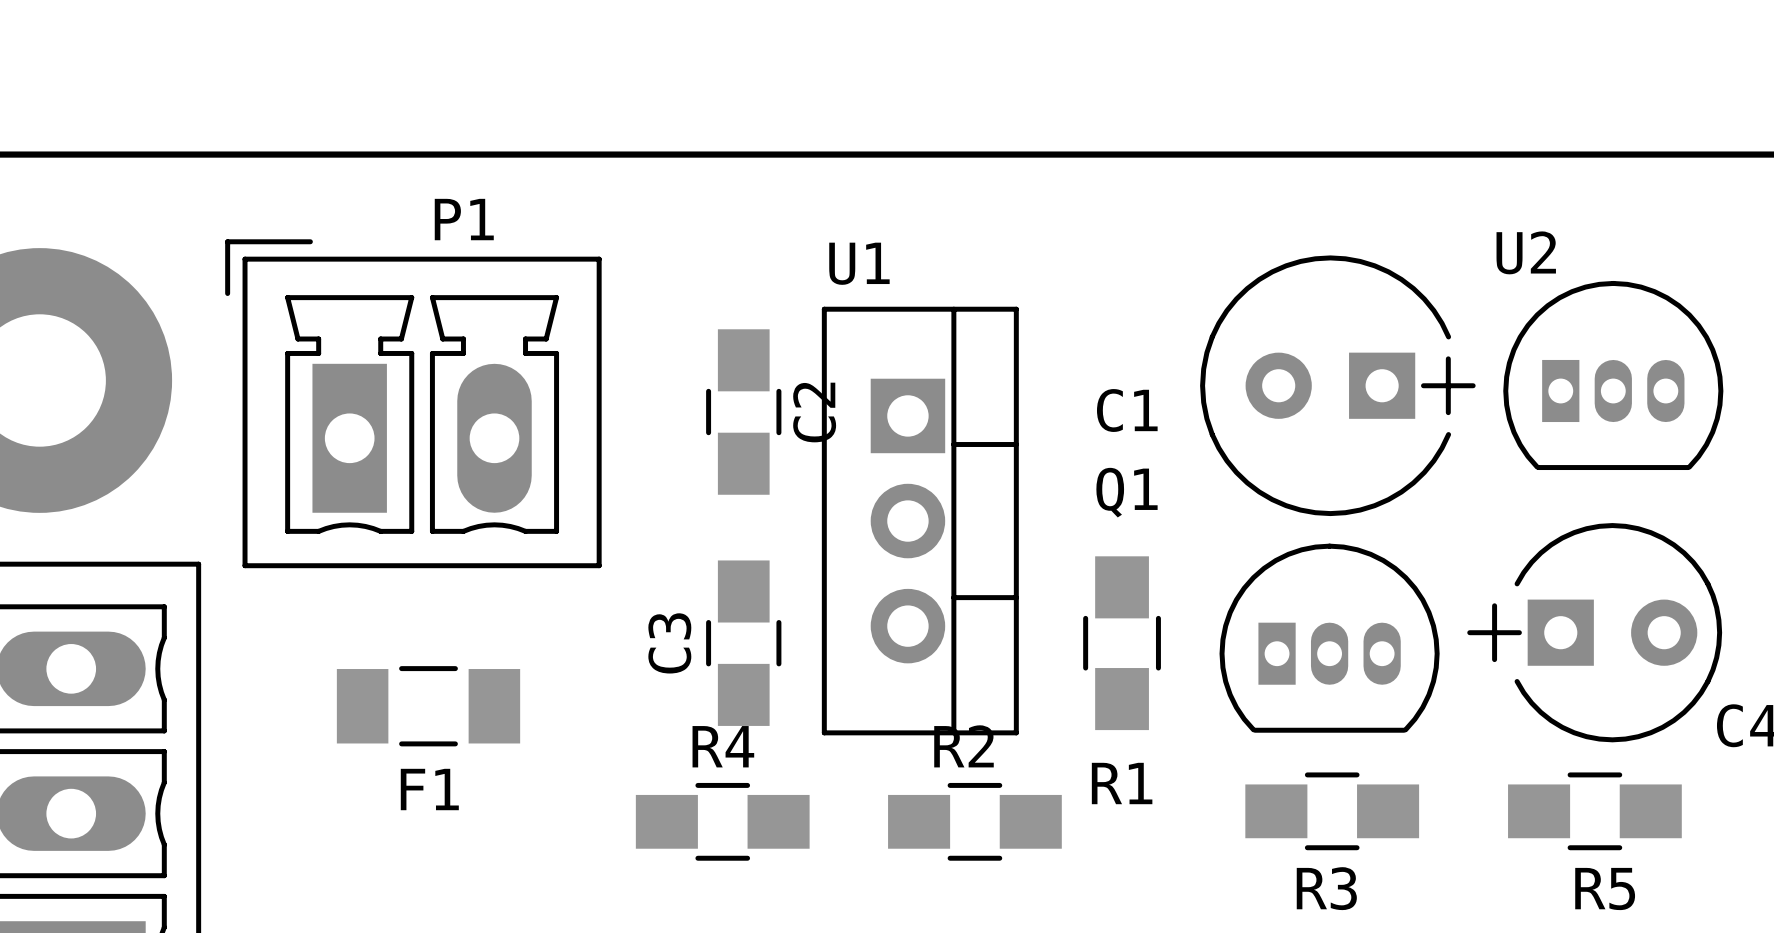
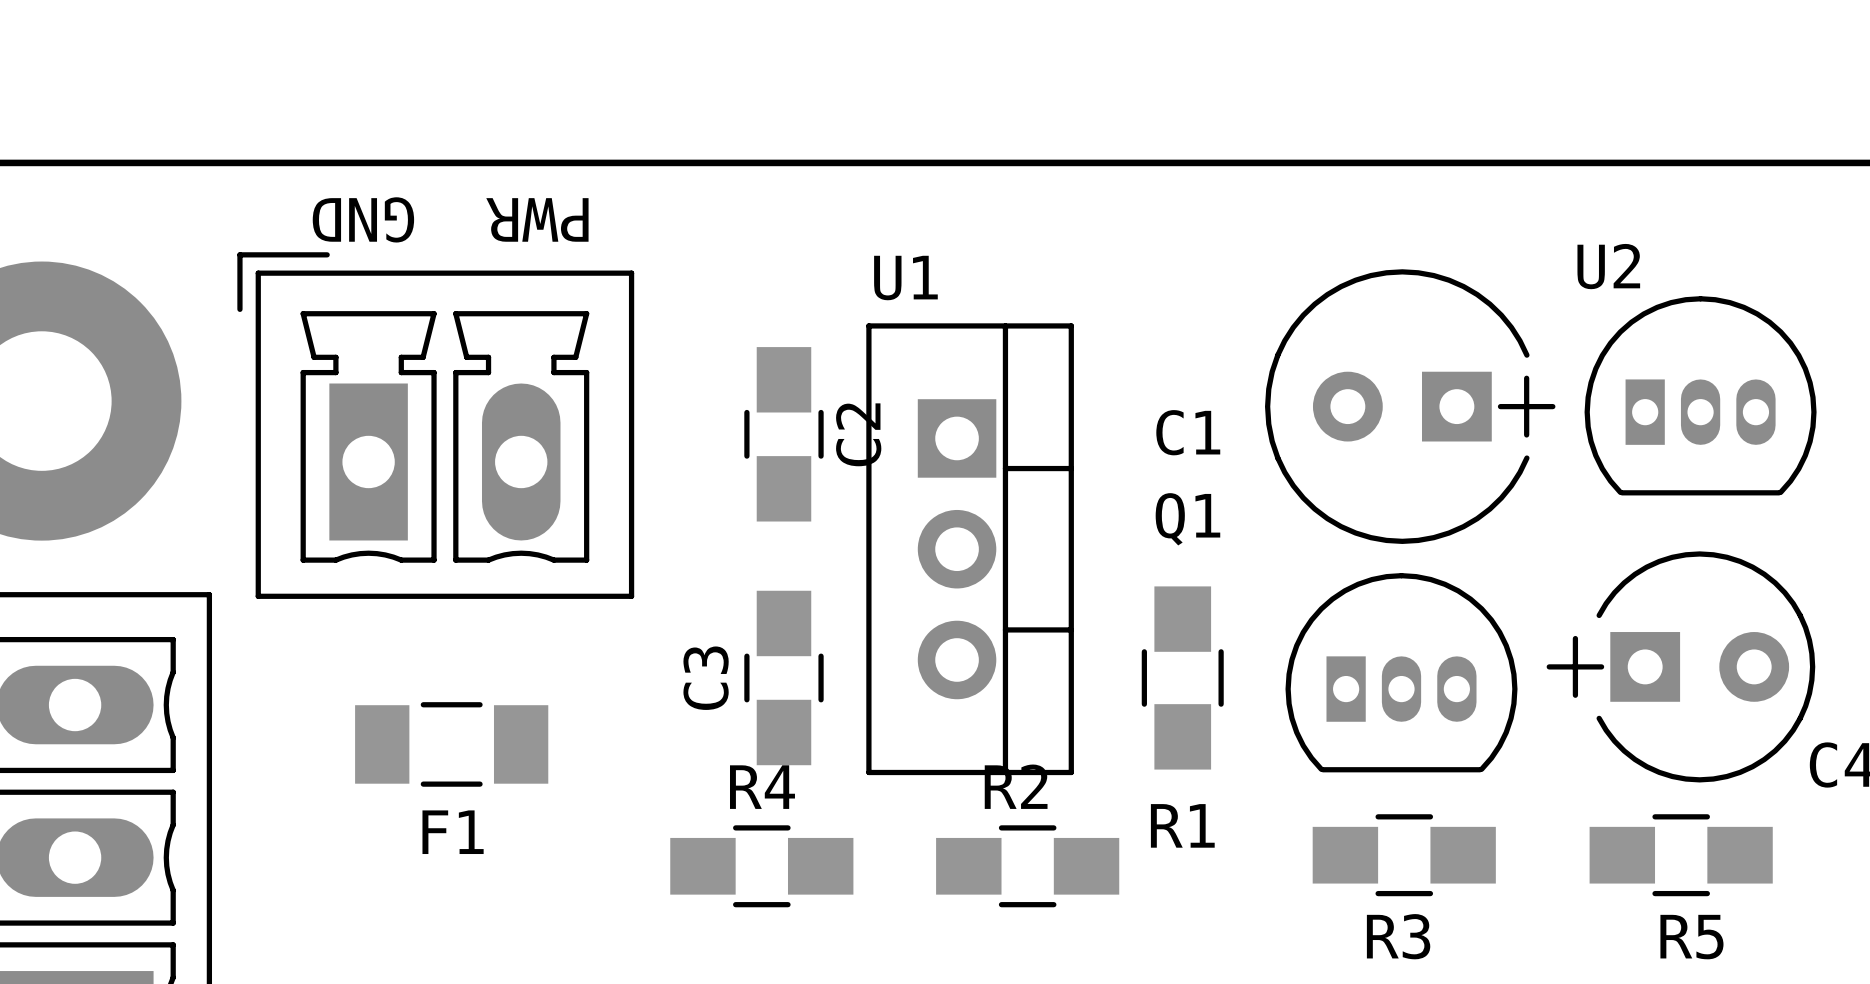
text: none -> GND (363, 219)
text: none -> PWR (537, 219)
P1 name: P1 (464, 219) -> none

